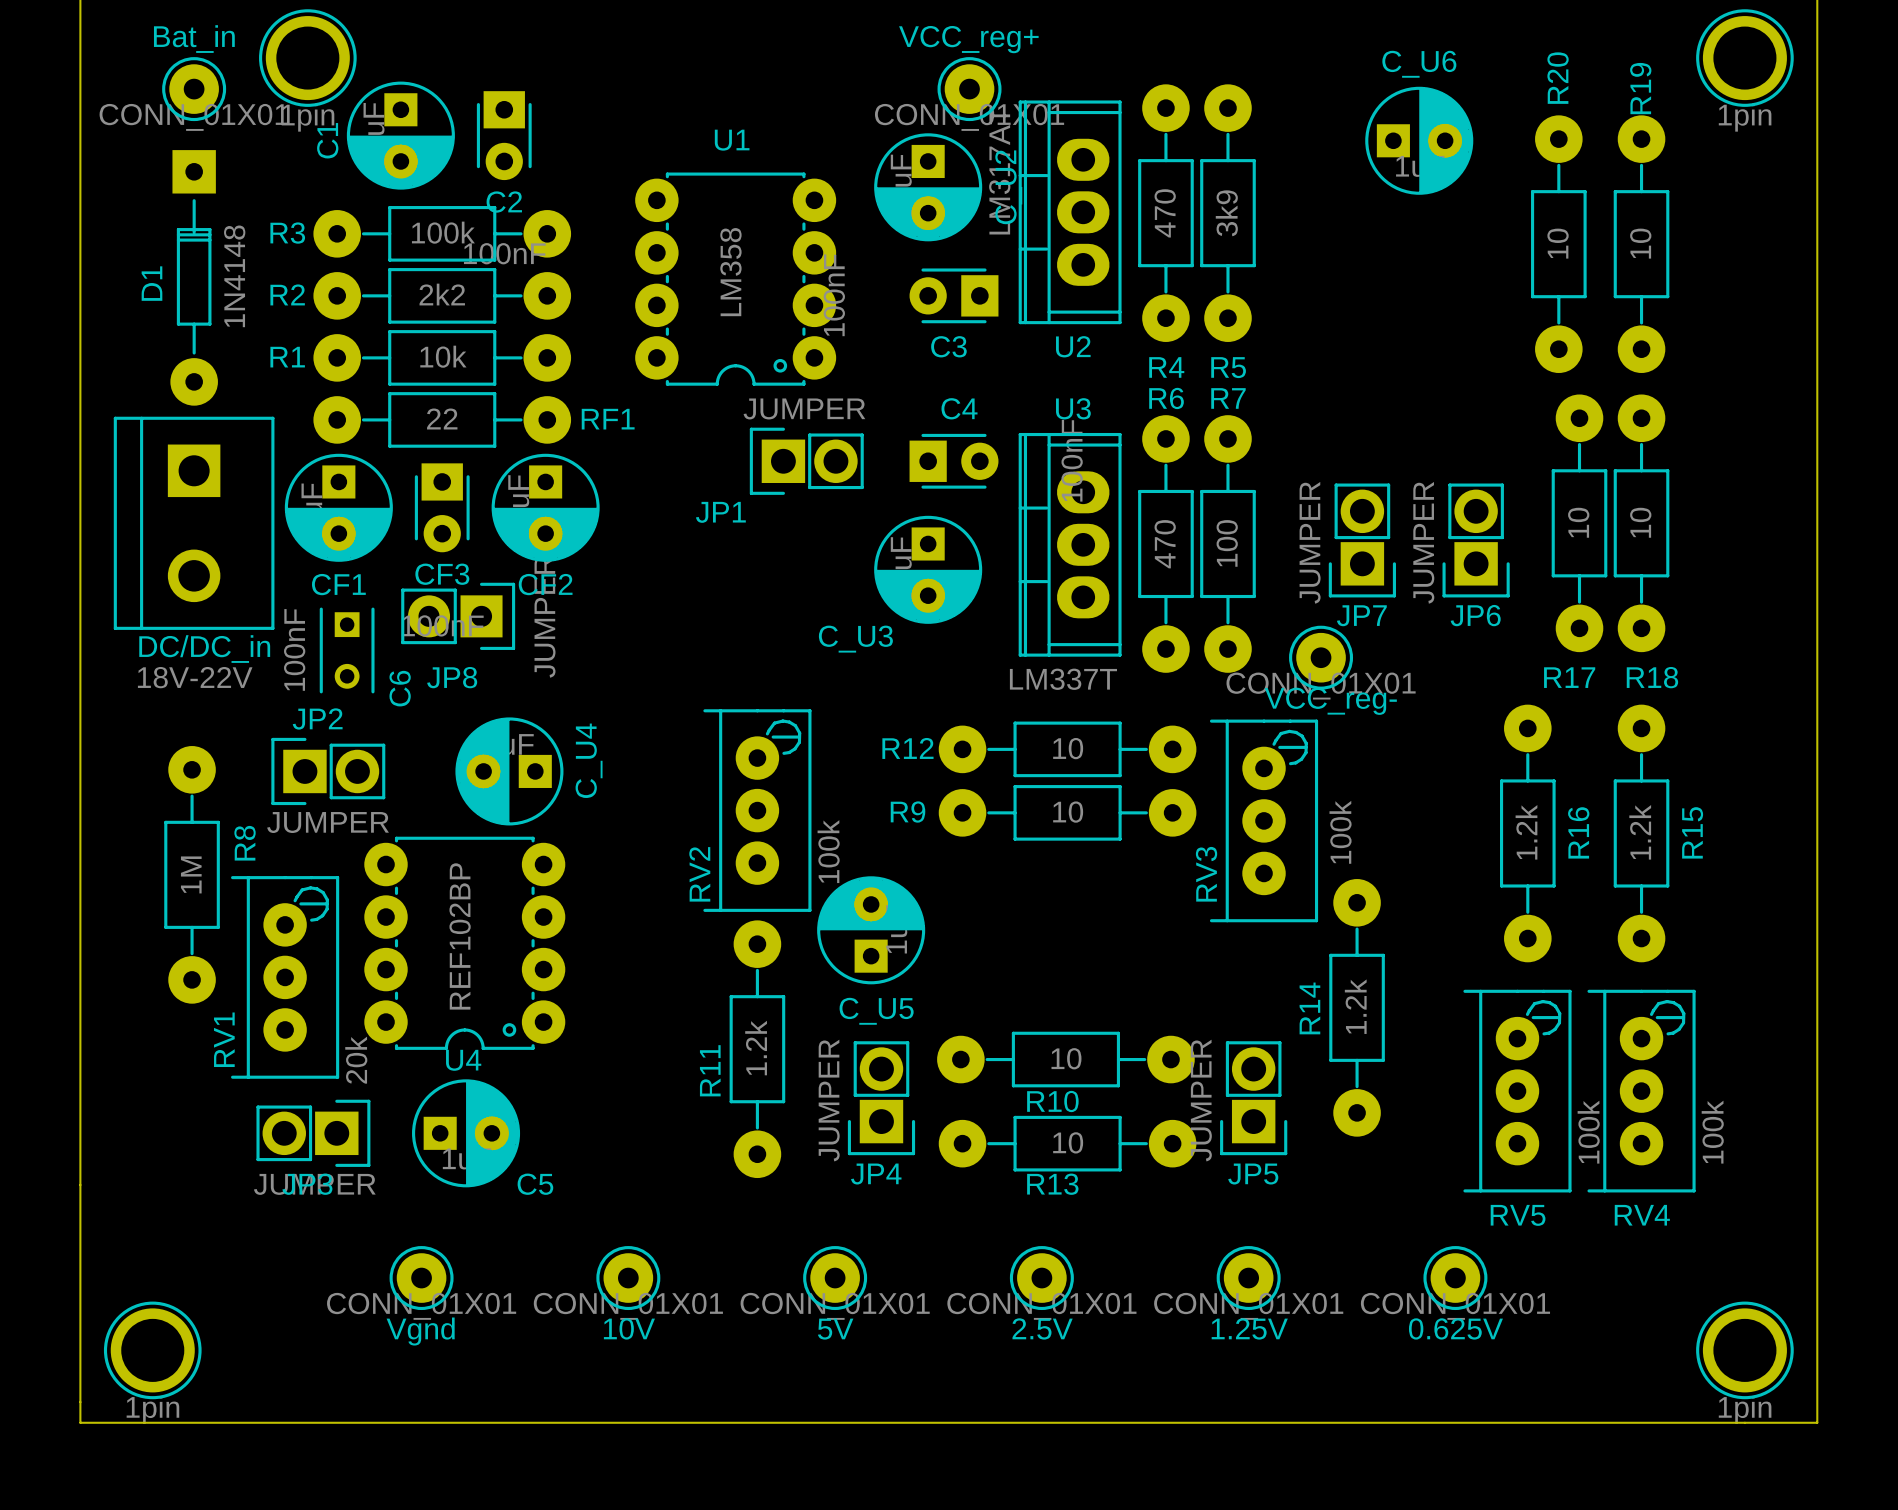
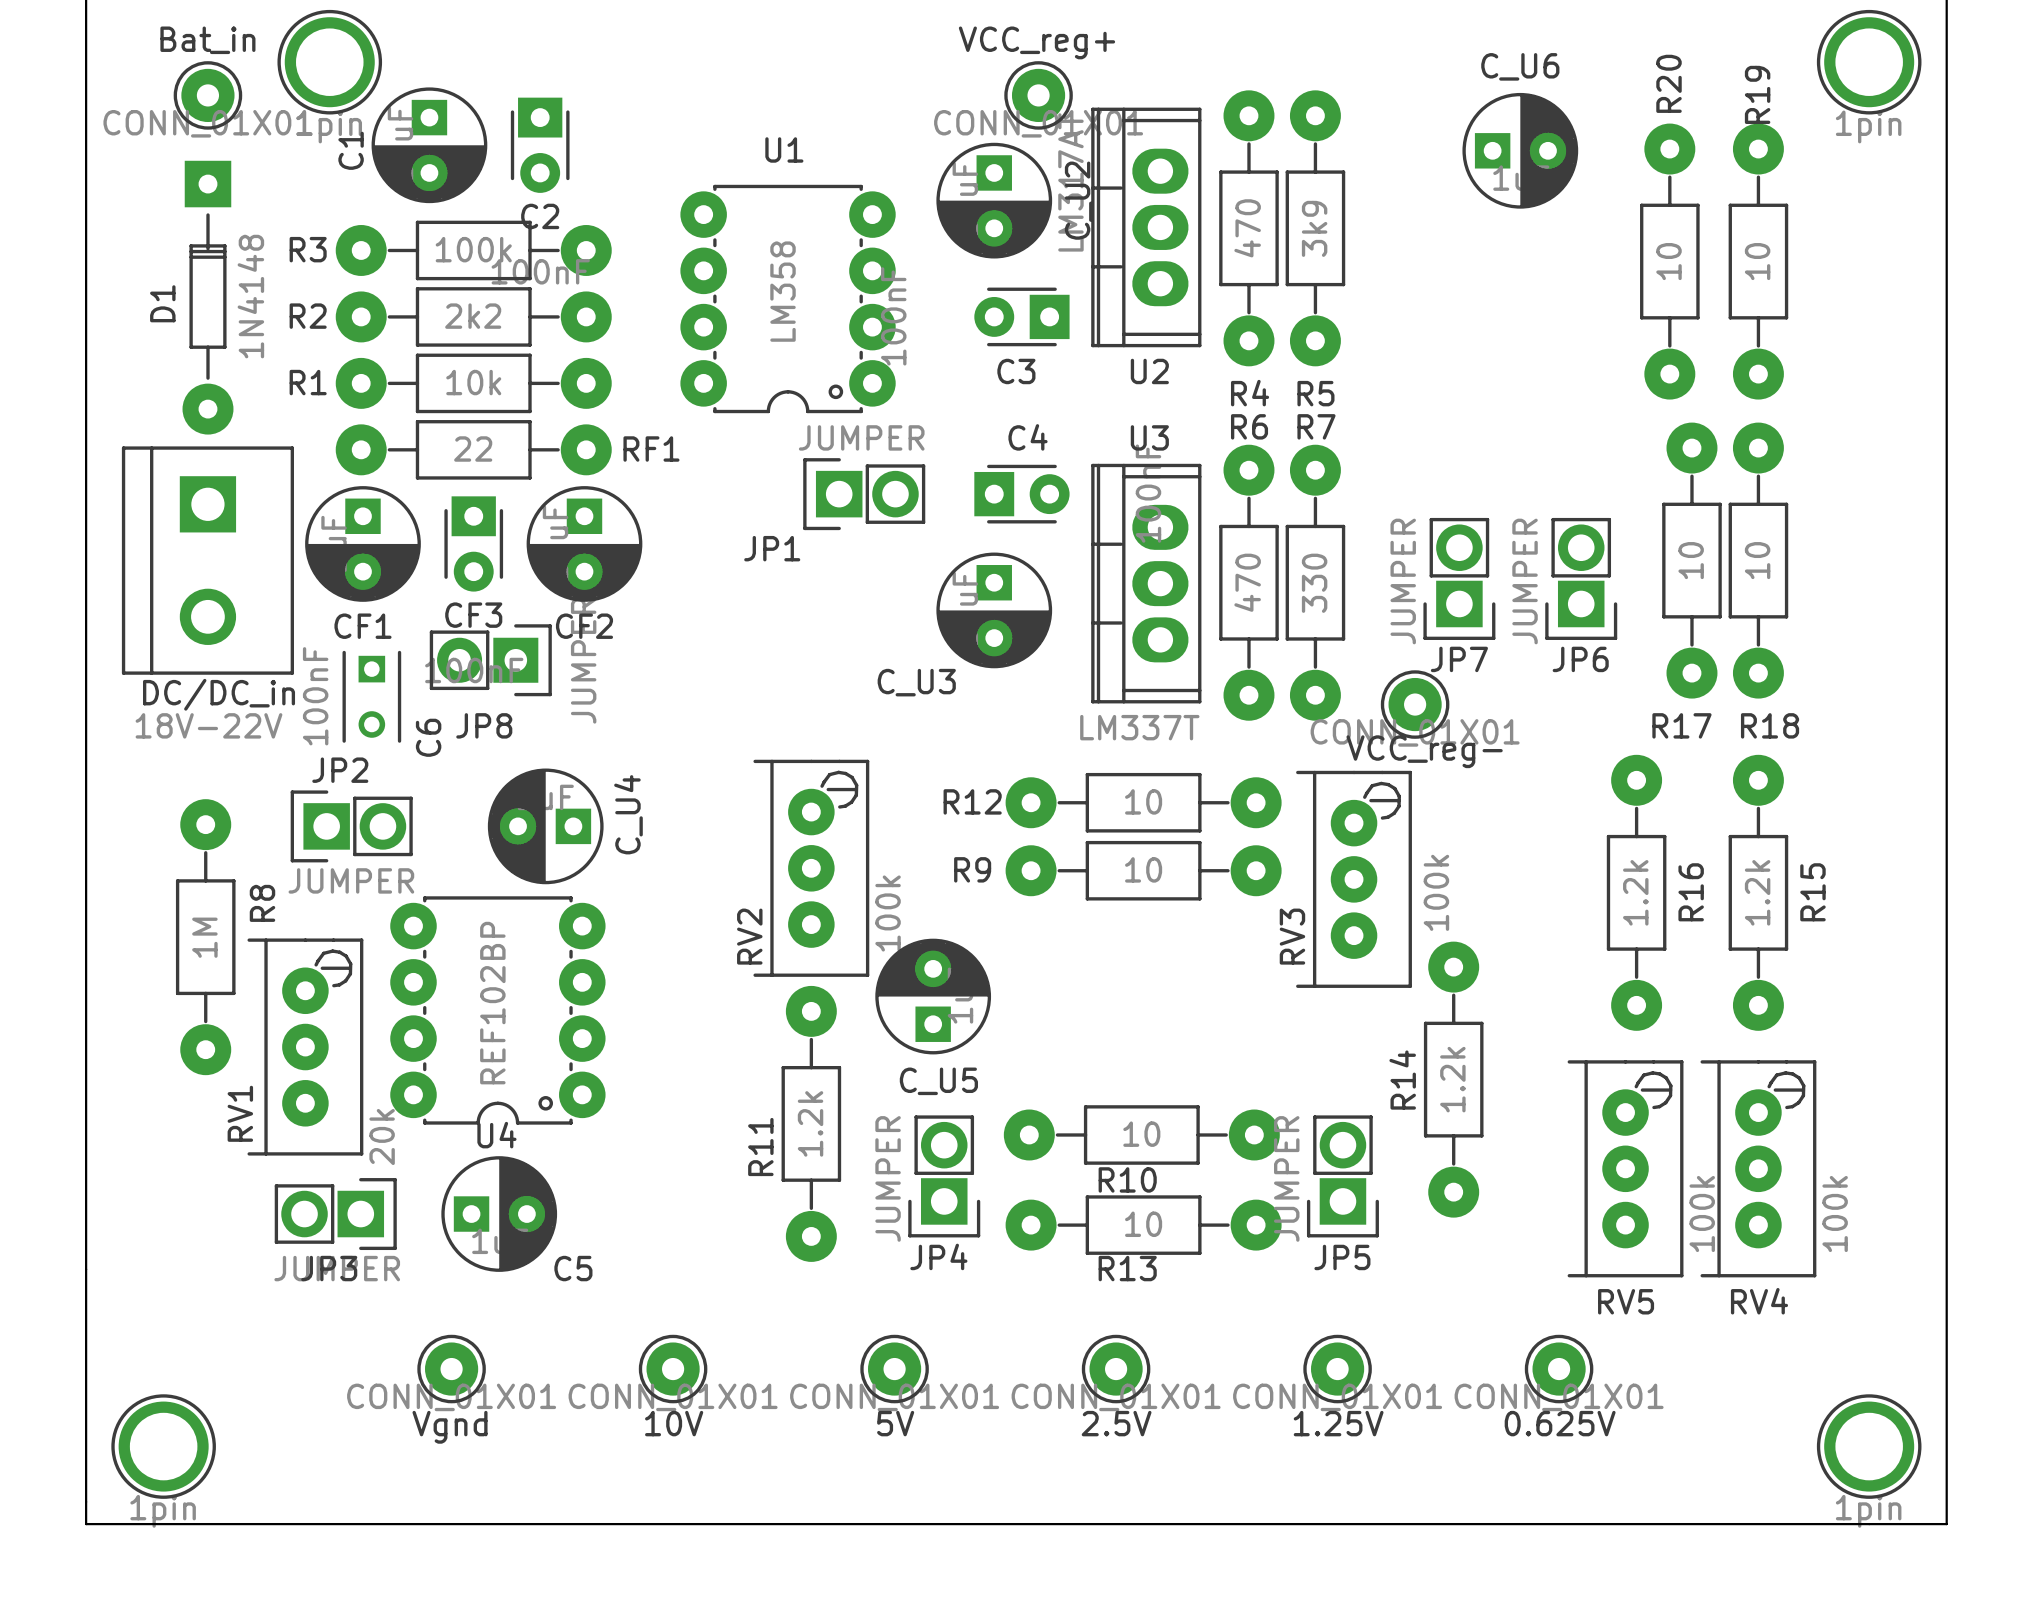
R7 value: 100 (1227, 543) -> 330 (1314, 583)

